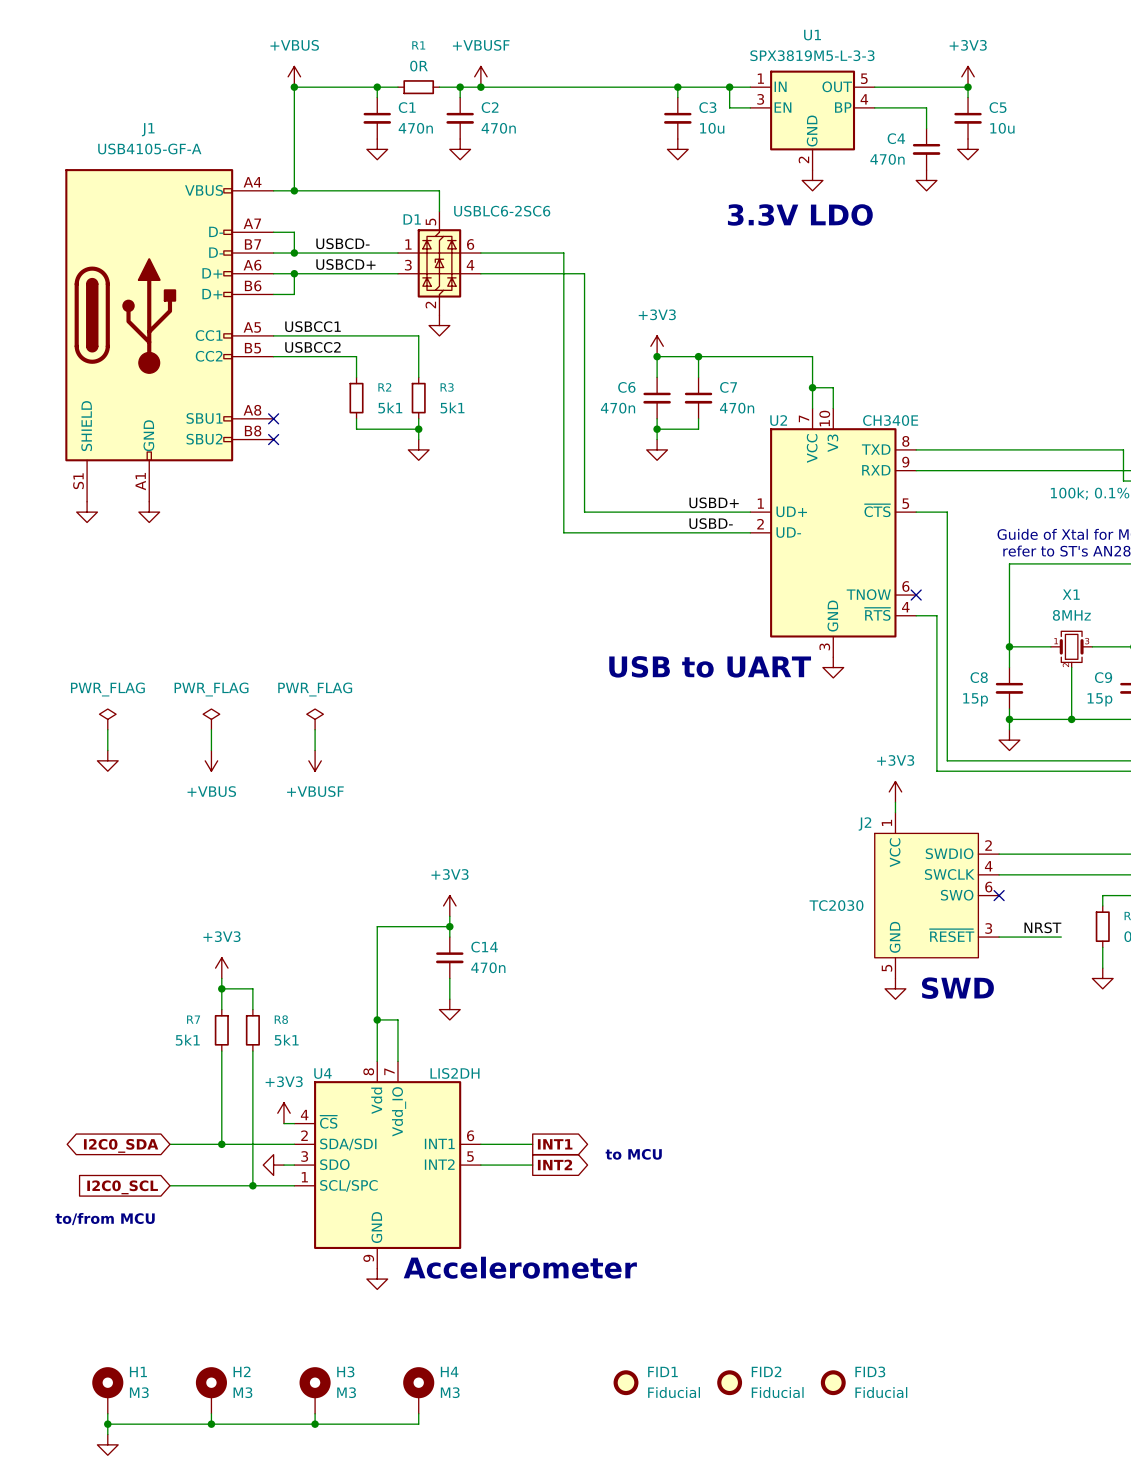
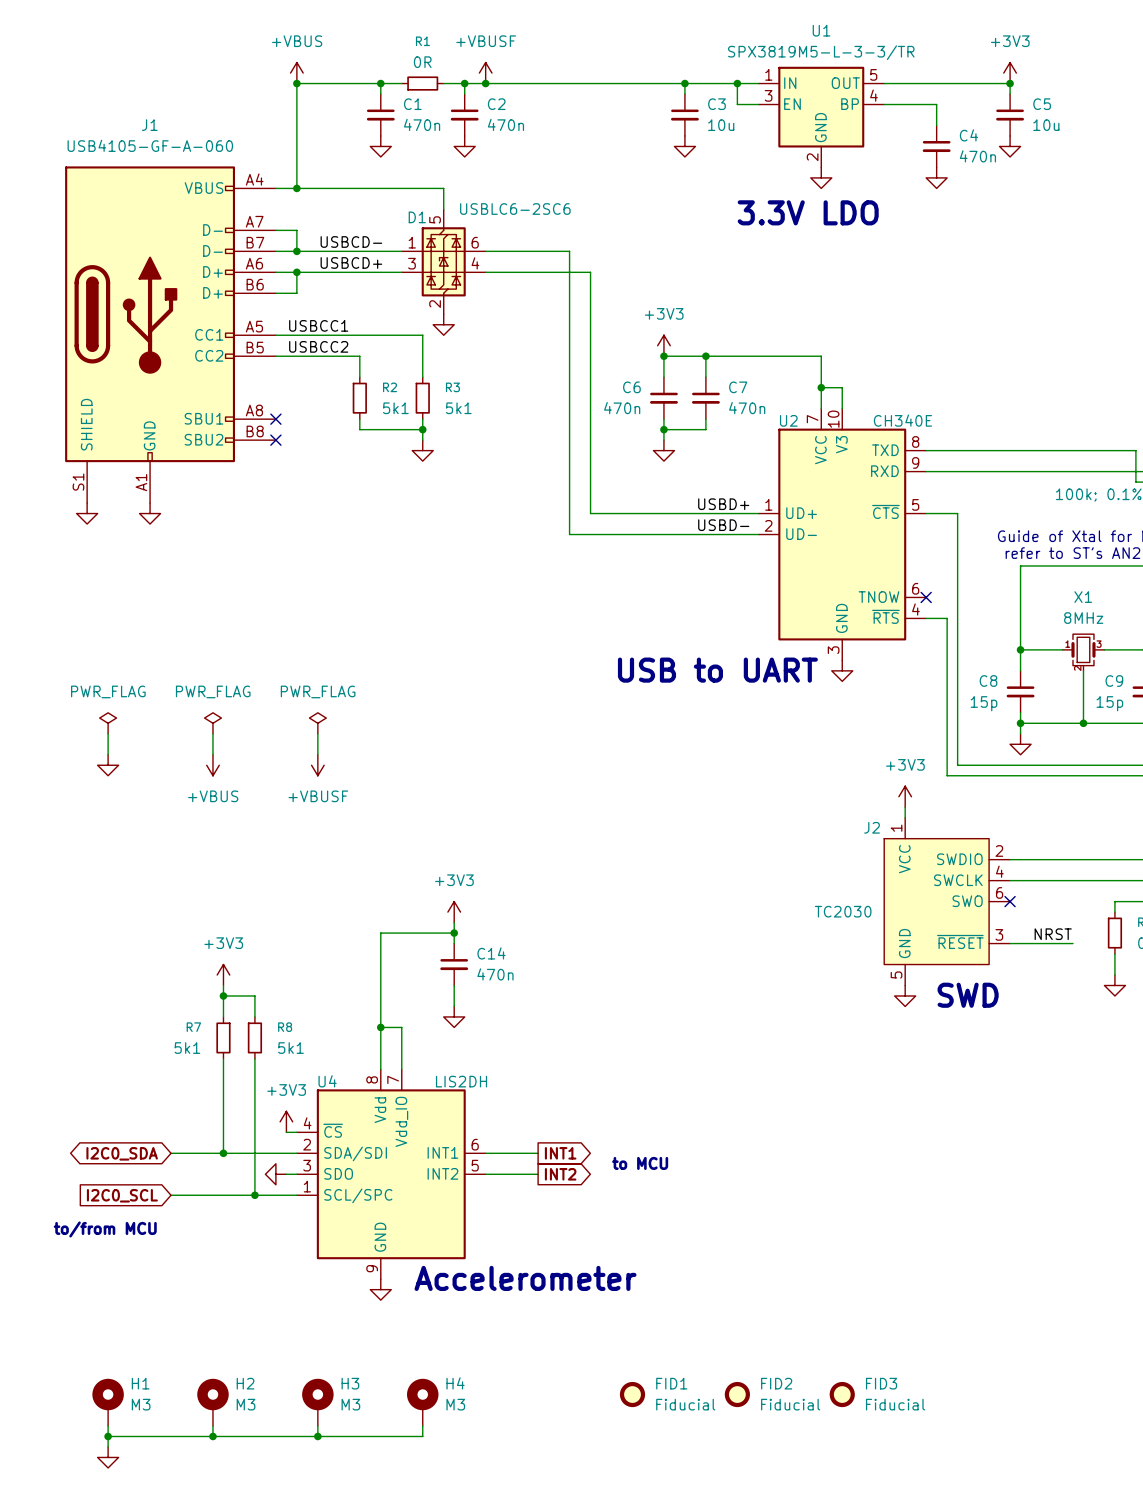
U1 value: SPX3819M5-L-3-3 (812, 55) -> SPX3819M5-L-3-3/TR (821, 52)
power symbol position: +3V3 (968, 76) -> +3V3 (1010, 73)
wire: (968, 87) (968, 97) -> (978, 83) (1010, 83) (1010, 94)
junction position: (968, 87) -> (1010, 83)
C5 position: (968, 118) -> (1010, 115)
C4 name position: C4 (896, 138) -> C4 (968, 135)
J1 value: USB4105-GF-A (149, 148) -> USB4105-GF-A-060 (150, 145)
power symbol position: (968, 149) -> (1010, 146)
C4 value position: 470n (887, 159) -> 470n (977, 156)

